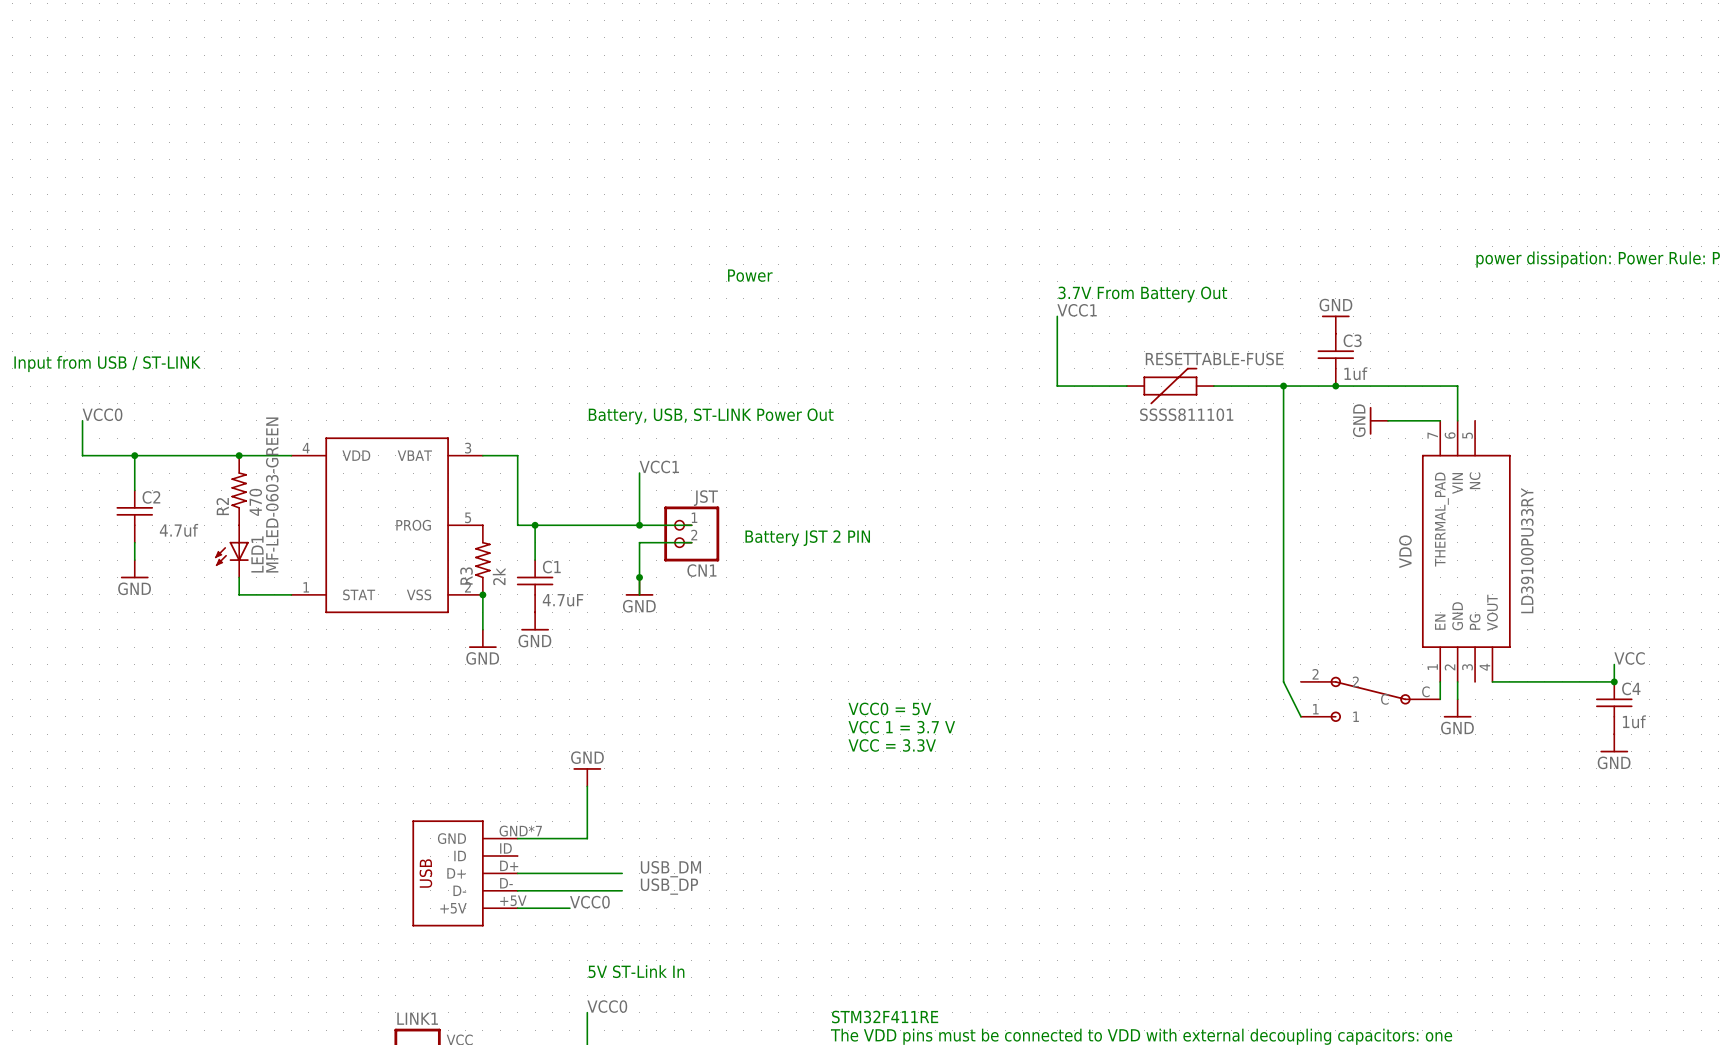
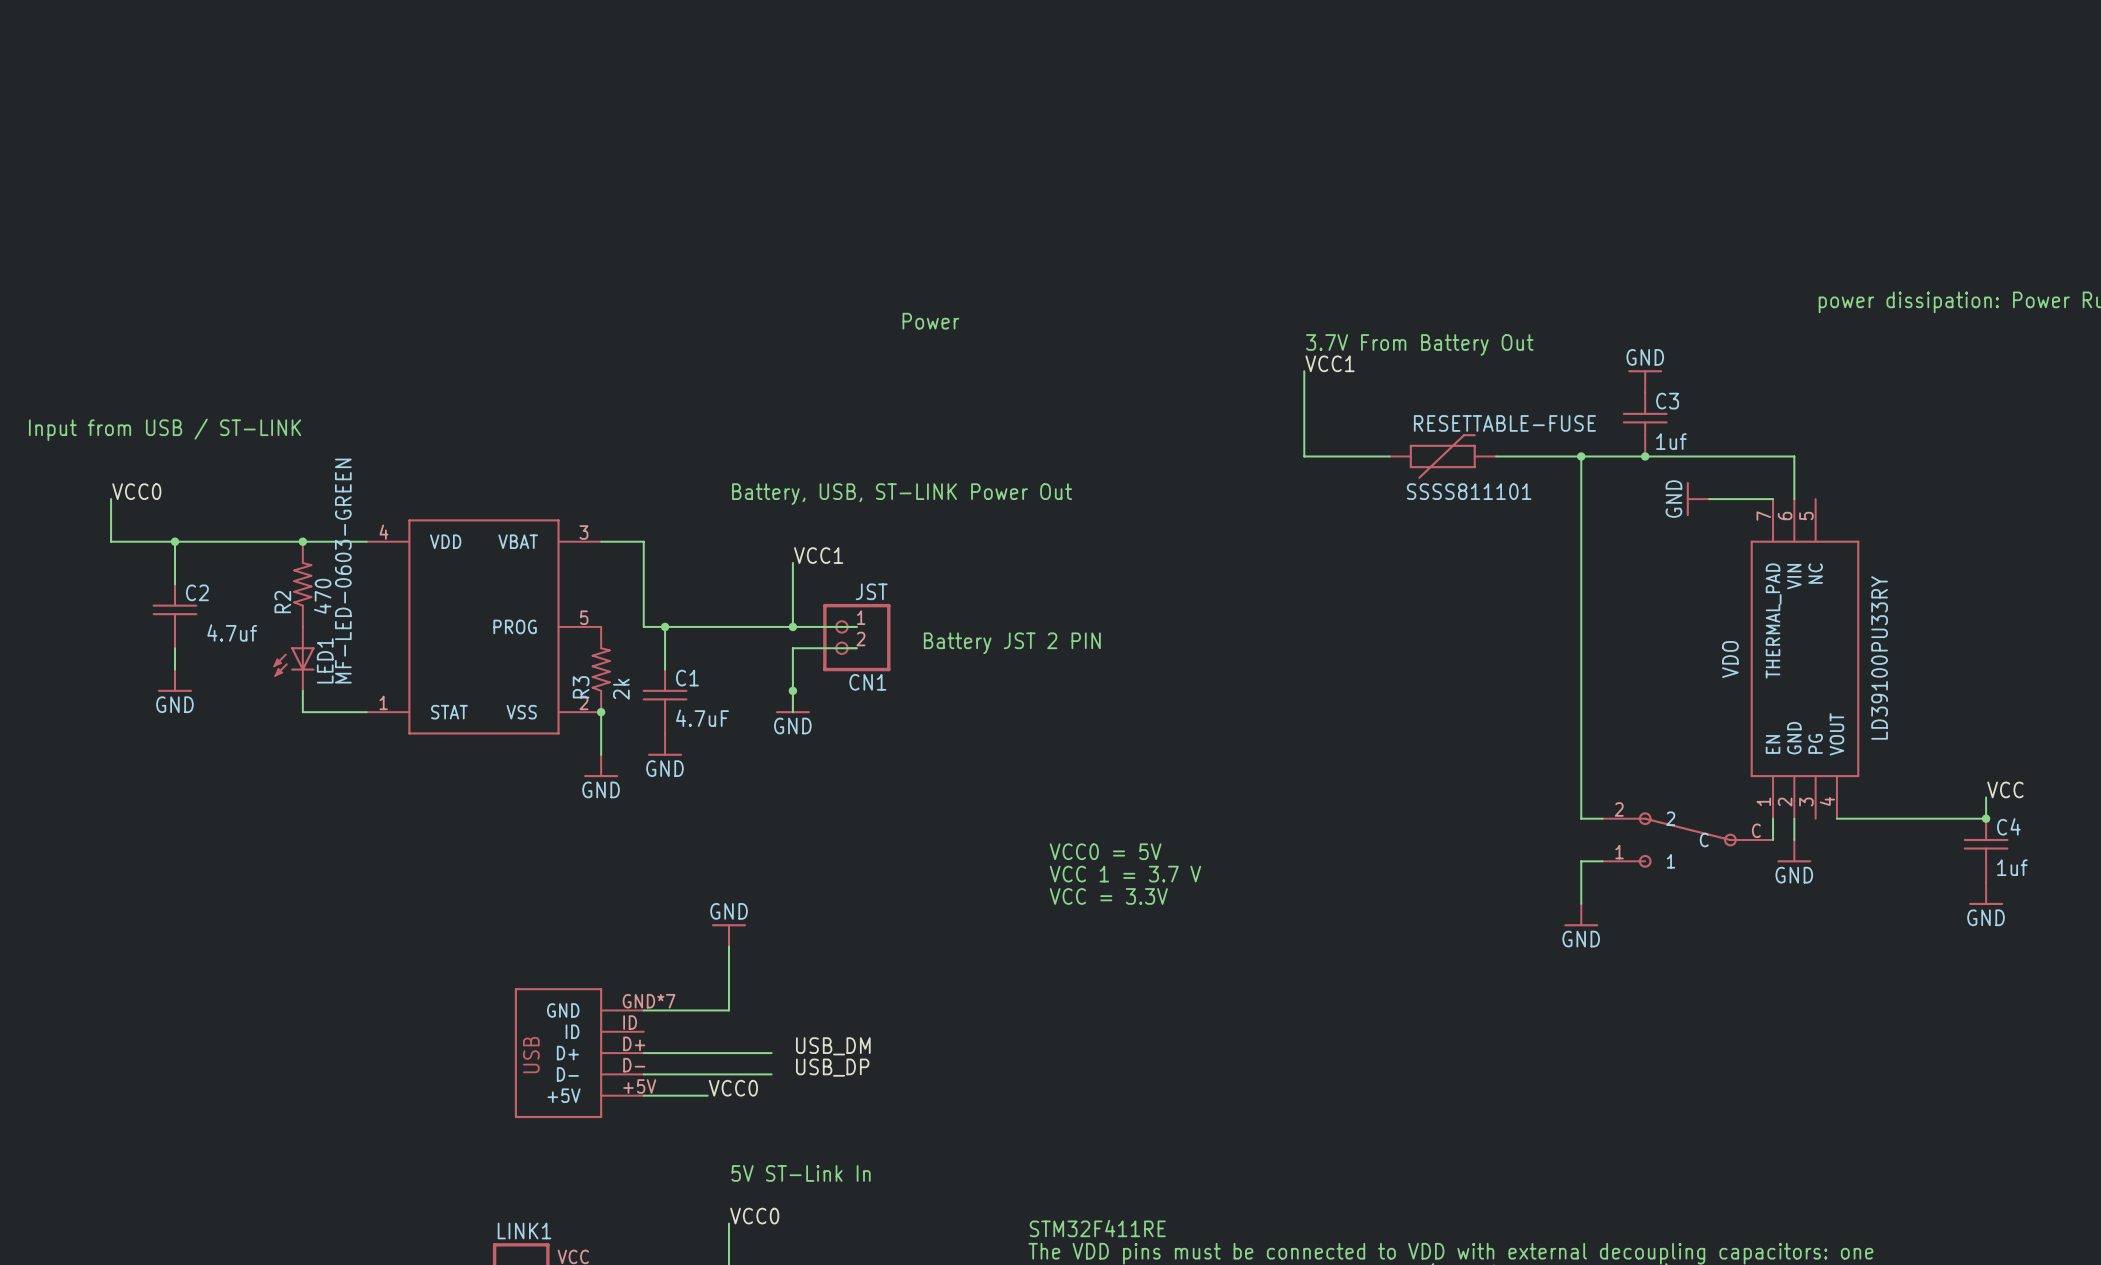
wire: (1283, 681) (1300, 716) -> (1581, 818) (1602, 818)
wire: none -> (1602, 861) (1581, 861) (1581, 903)
power symbol: none -> GND (1581, 915)

